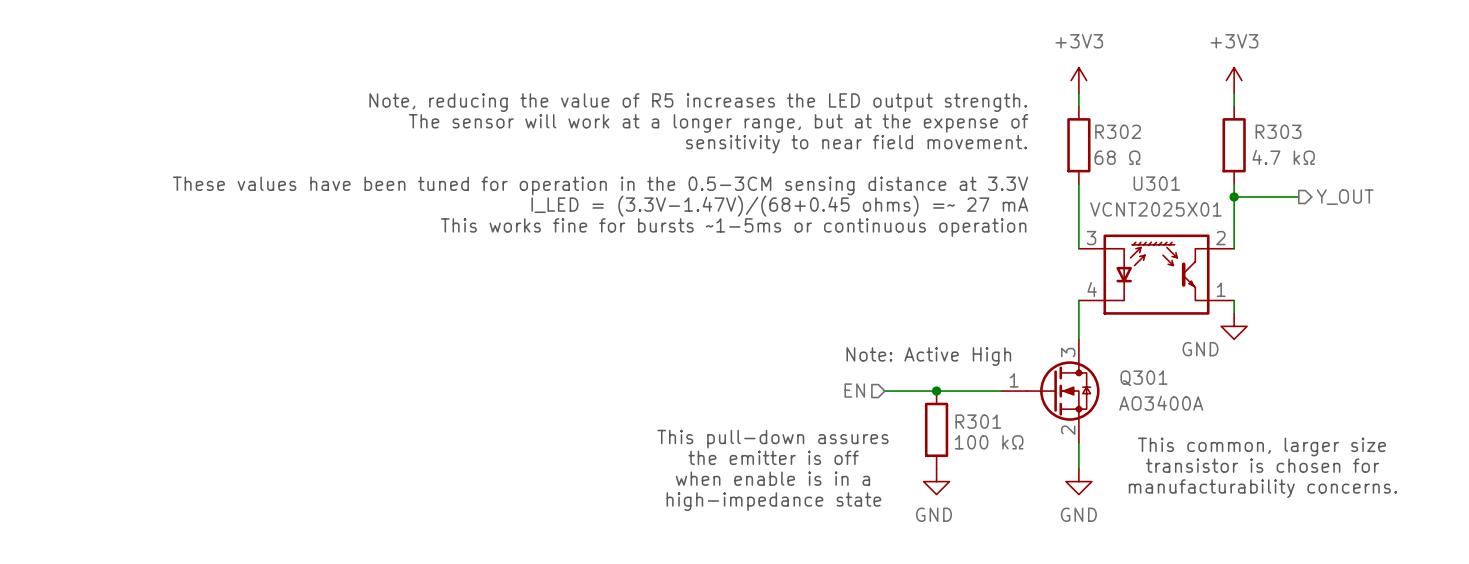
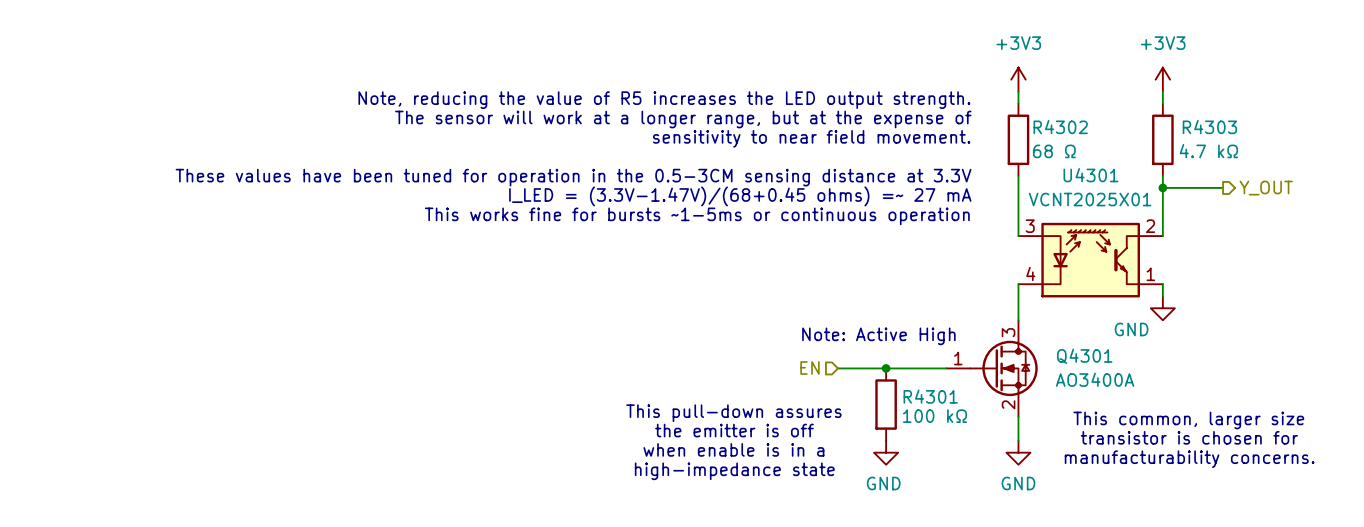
R302 name: R302 (1118, 131) -> R4302 (1060, 127)
R303 name: R303 (1278, 131) -> R4303 (1209, 127)
U301 name: U301 (1156, 183) -> U4301 (1090, 175)
Q301 name: Q301 (1143, 378) -> Q4301 (1084, 356)
R301 name: R301 (978, 421) -> R4301 (930, 396)

